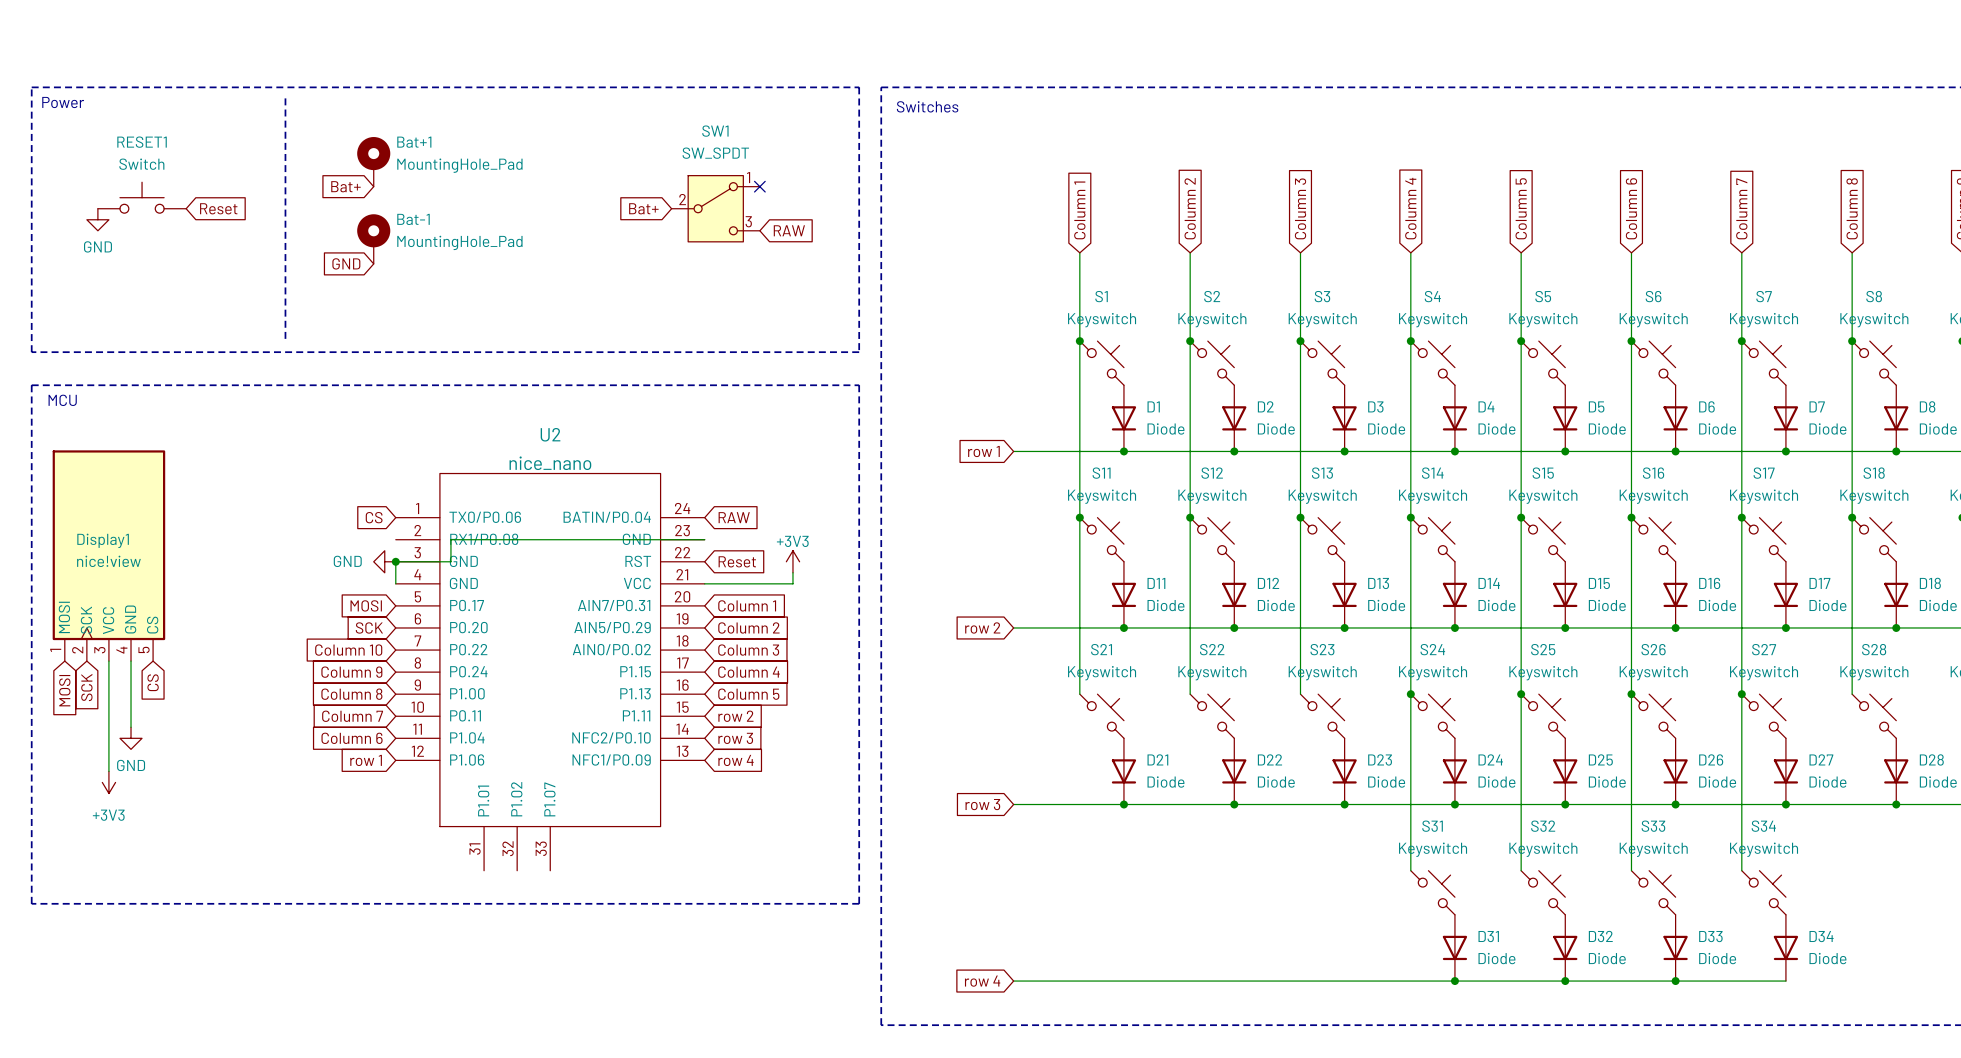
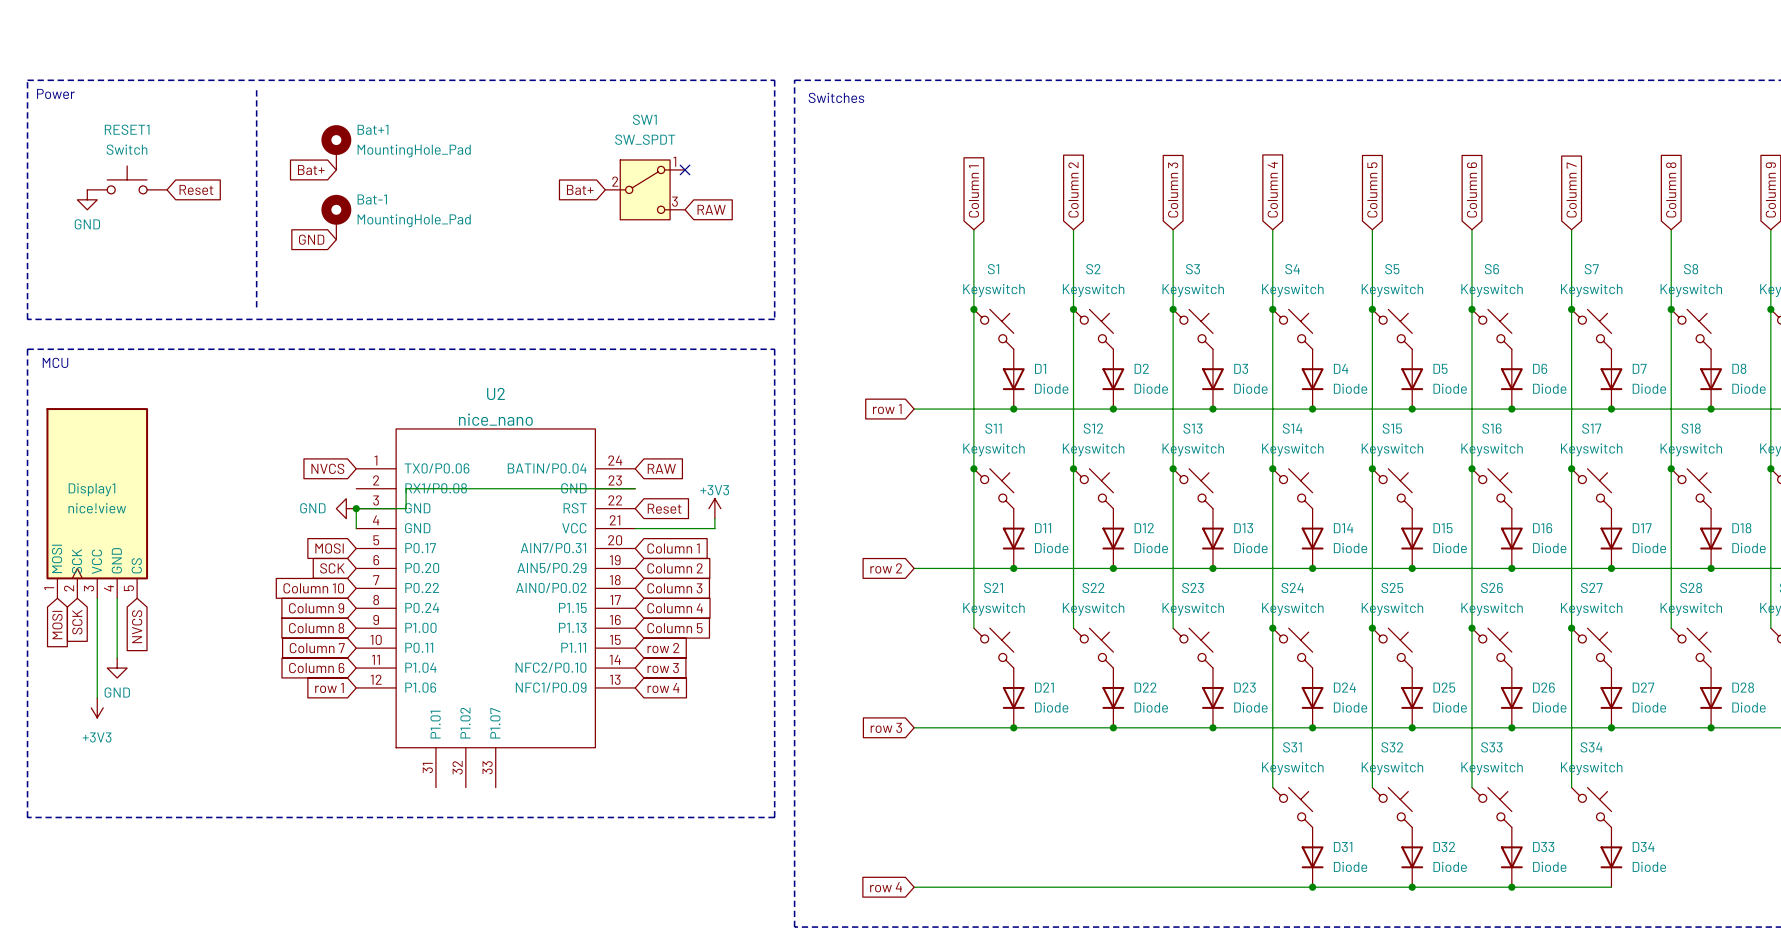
global label: CS (374, 517) -> NVCS (327, 468)
global label: CS (153, 682) -> NVCS (137, 626)

